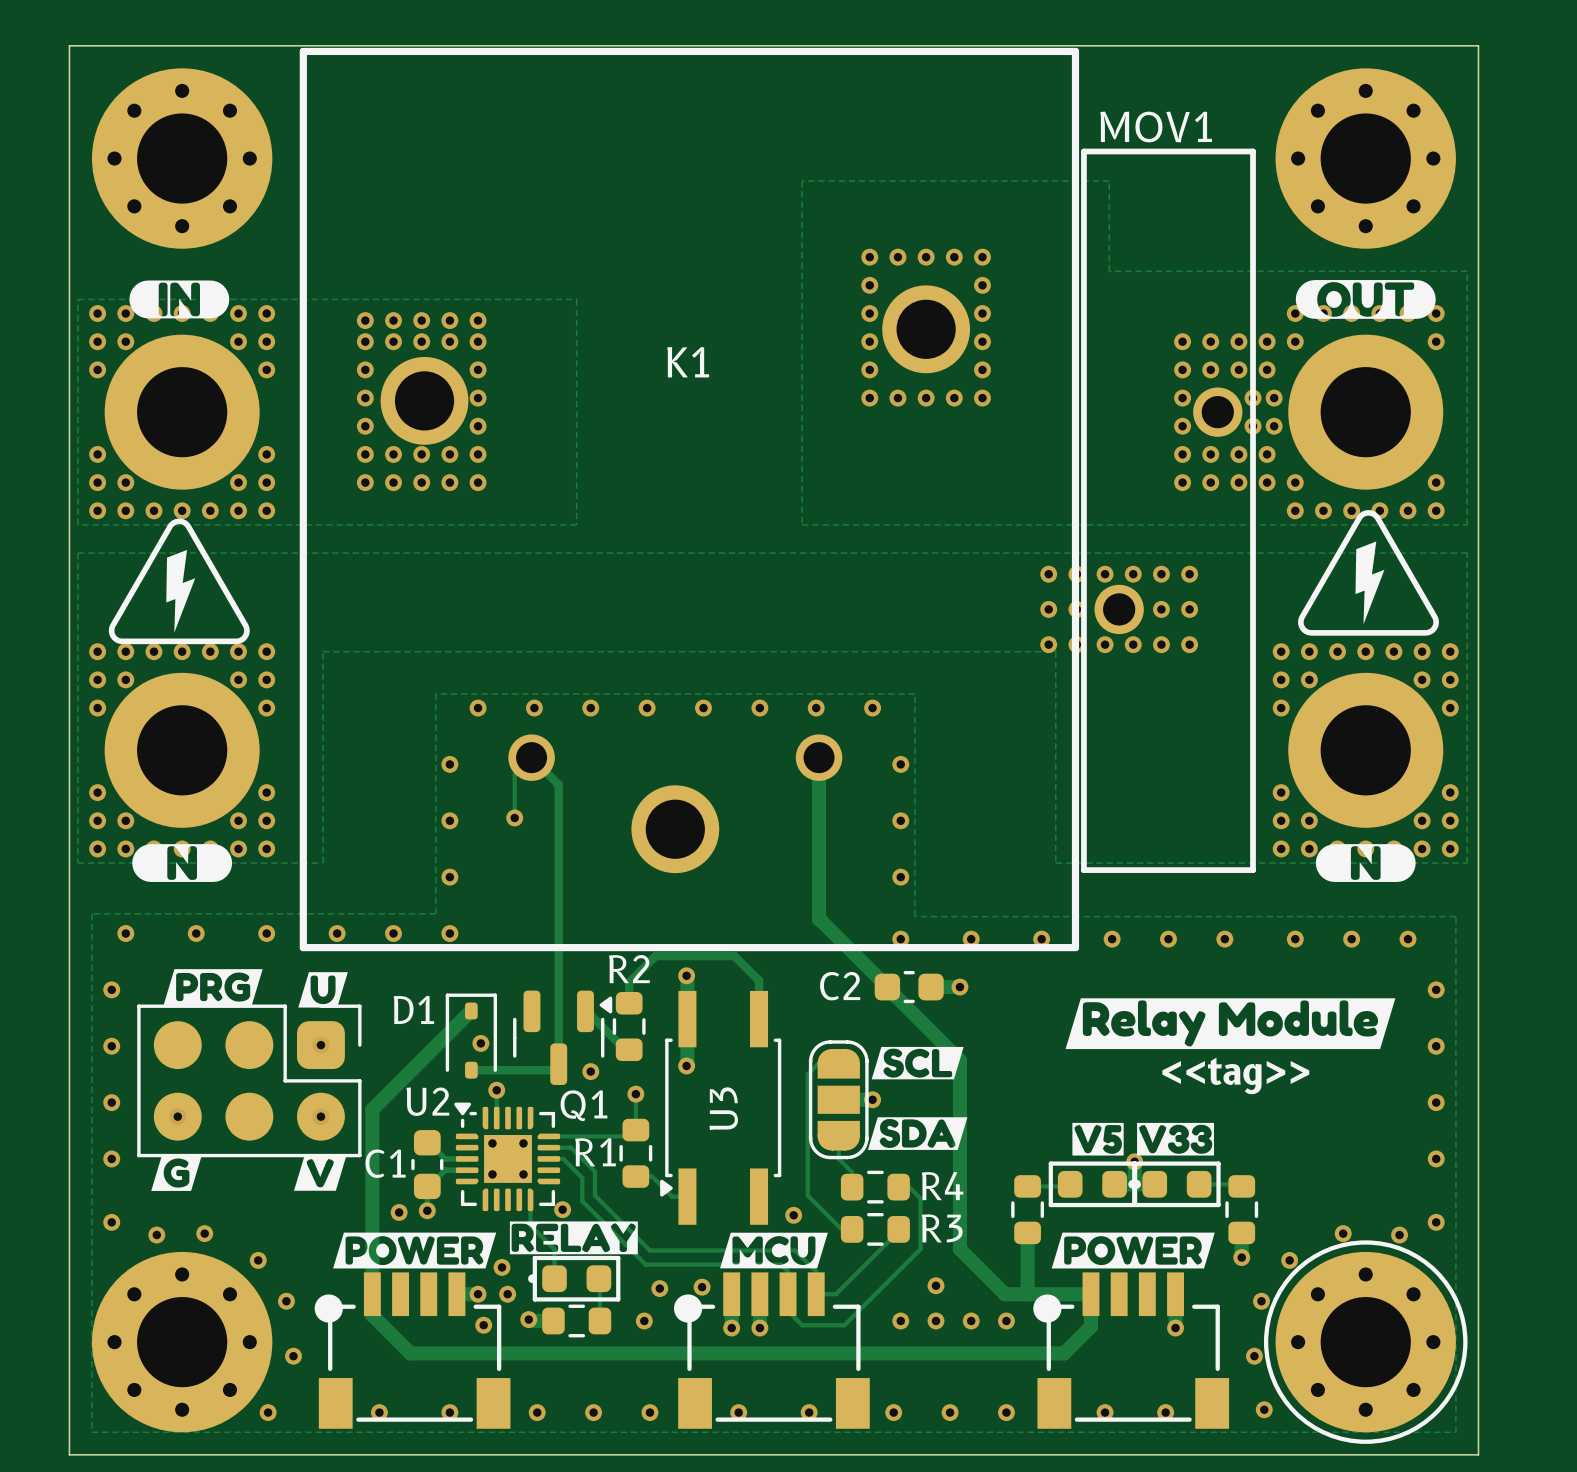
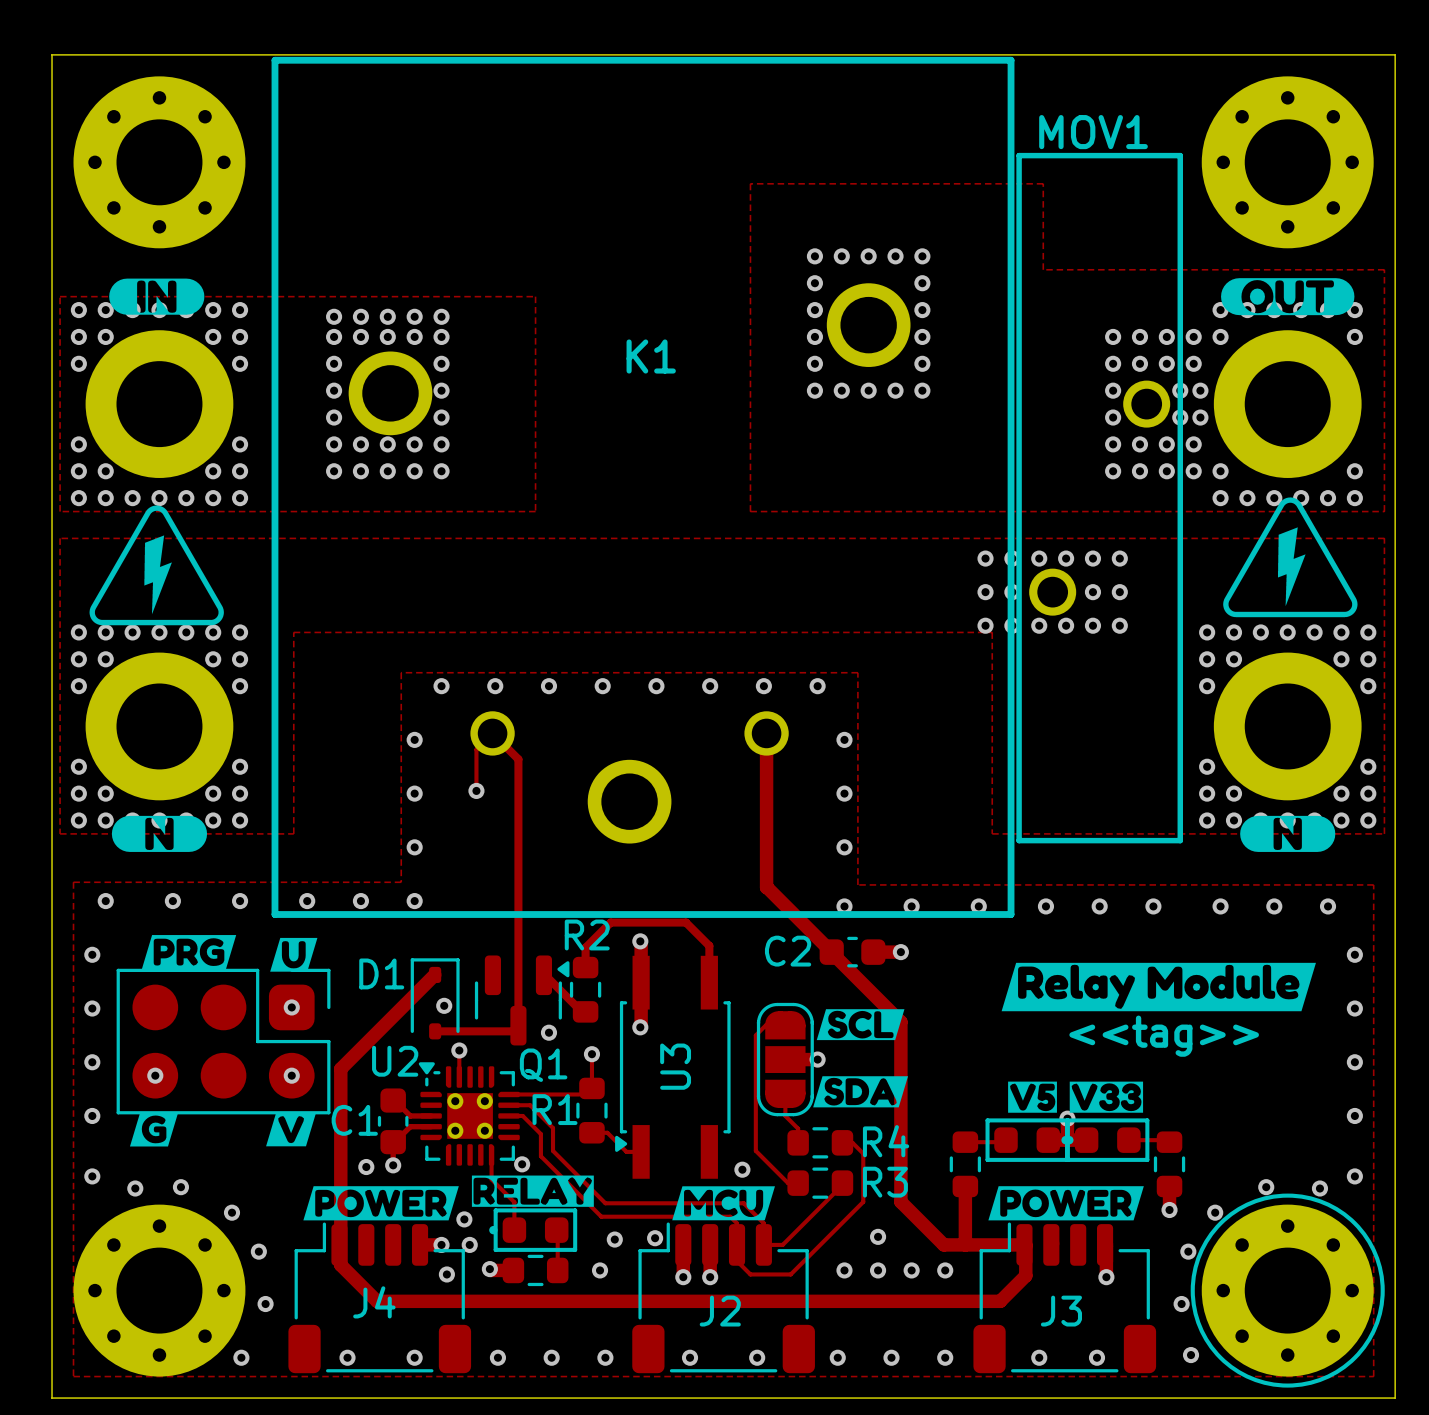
J4: none -> (379, 1297)
J2: none -> (723, 1297)
J3: none -> (1064, 1297)
part: (412, 1350) -> none
part: (771, 1350) -> none
part: (1131, 1350) -> none

